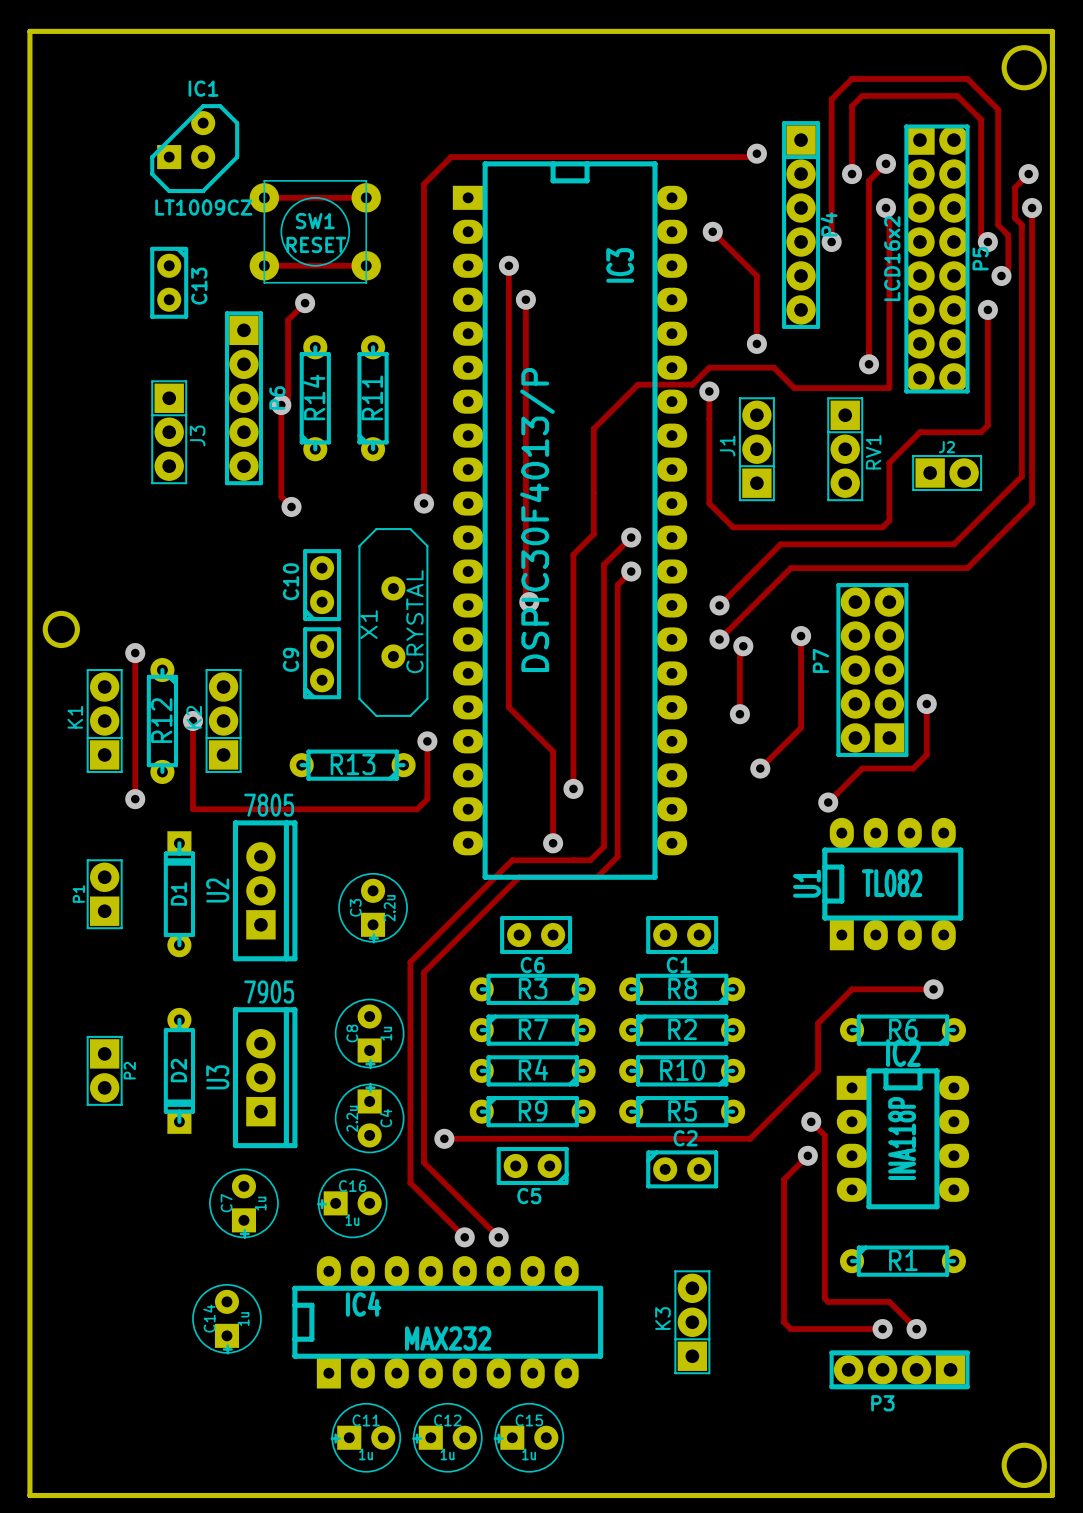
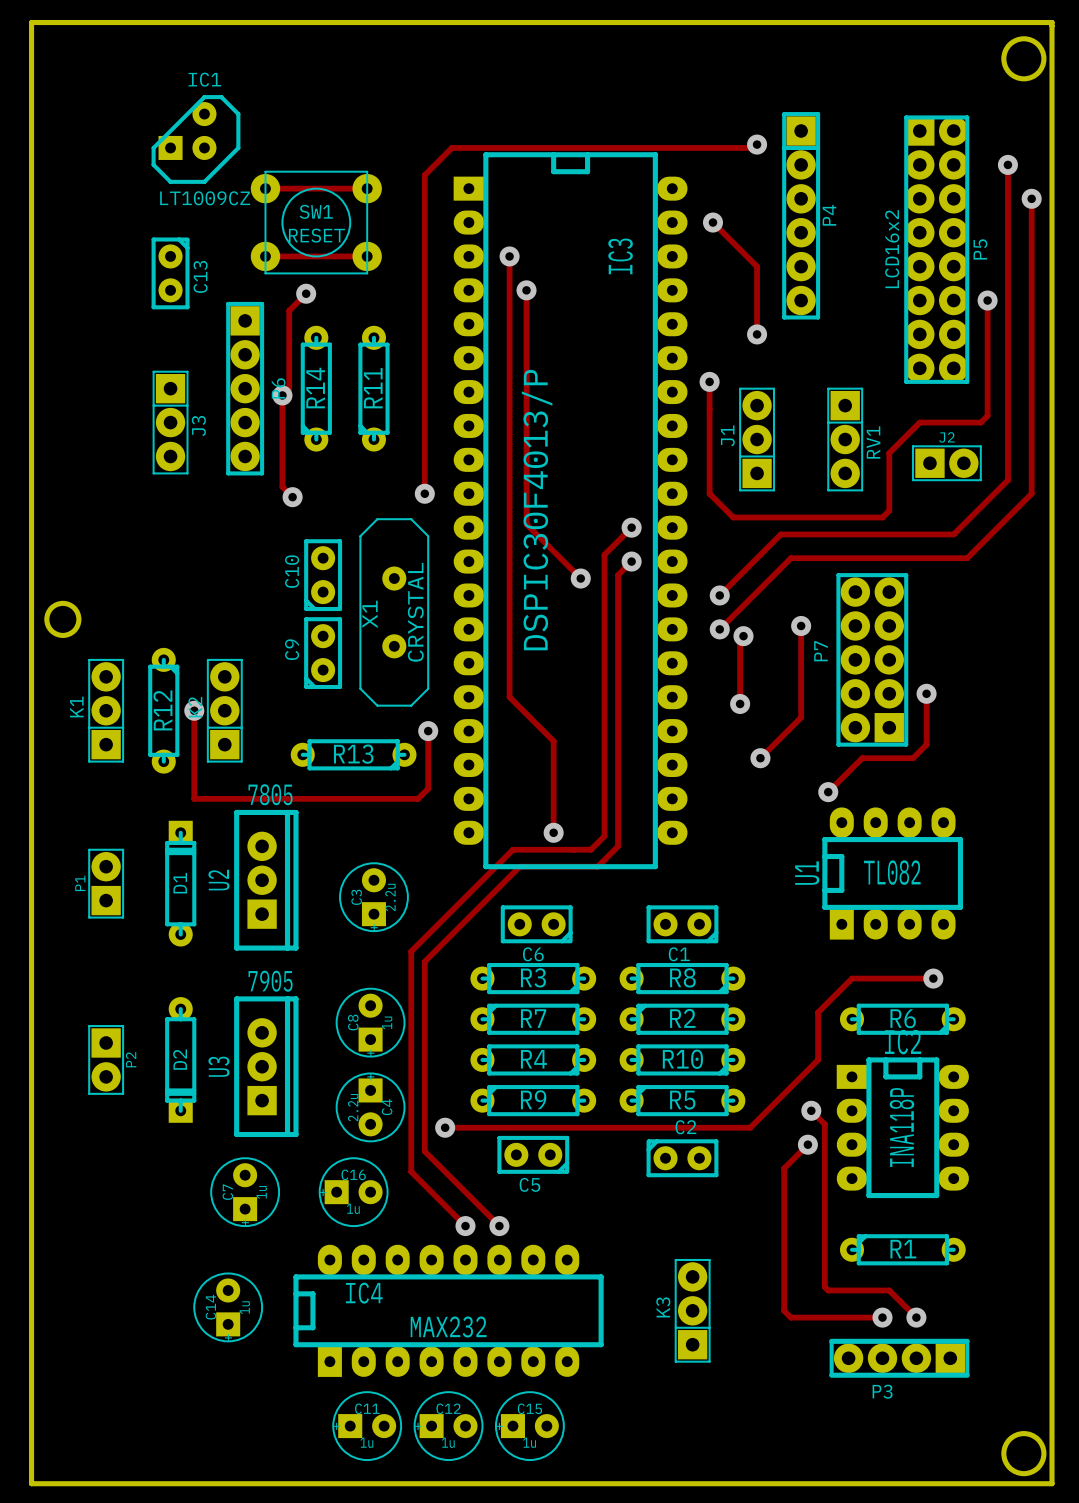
track: (885, 163) (869, 180) (869, 364) -> none
via: (885, 163) -> none
track: (852, 174) (852, 106) (862, 95) (957, 95) (981, 119) (981, 235) (987, 242) -> none
via: (852, 174) -> none
track: (1028, 174) (1015, 187) (1015, 218) (1021, 225) (1021, 476) (1008, 489) -> (1007, 259) (1007, 480)
via position: (1028, 174) -> (1007, 164)
track: (885, 208) (889, 211) (889, 388) (794, 388) (773, 367) (709, 367) (692, 384) (638, 384) (593, 428) (593, 534) (573, 554) (573, 788) -> none
via: (885, 208) -> none
track: (1008, 235) (998, 225) (998, 109) (967, 78) (852, 78) (831, 99) (831, 242) -> (1007, 225) (1007, 164)
via: (831, 242) -> none
via: (987, 242) -> none
via: (1001, 275) -> none
via: (869, 364) -> none
track: (525, 534) (525, 598) (529, 602) -> (526, 524) (580, 578)
via position: (529, 602) -> (580, 578)
track: (135, 653) (135, 799) -> none
via: (135, 653) -> none
via: (573, 788) -> none
via: (135, 799) -> none

